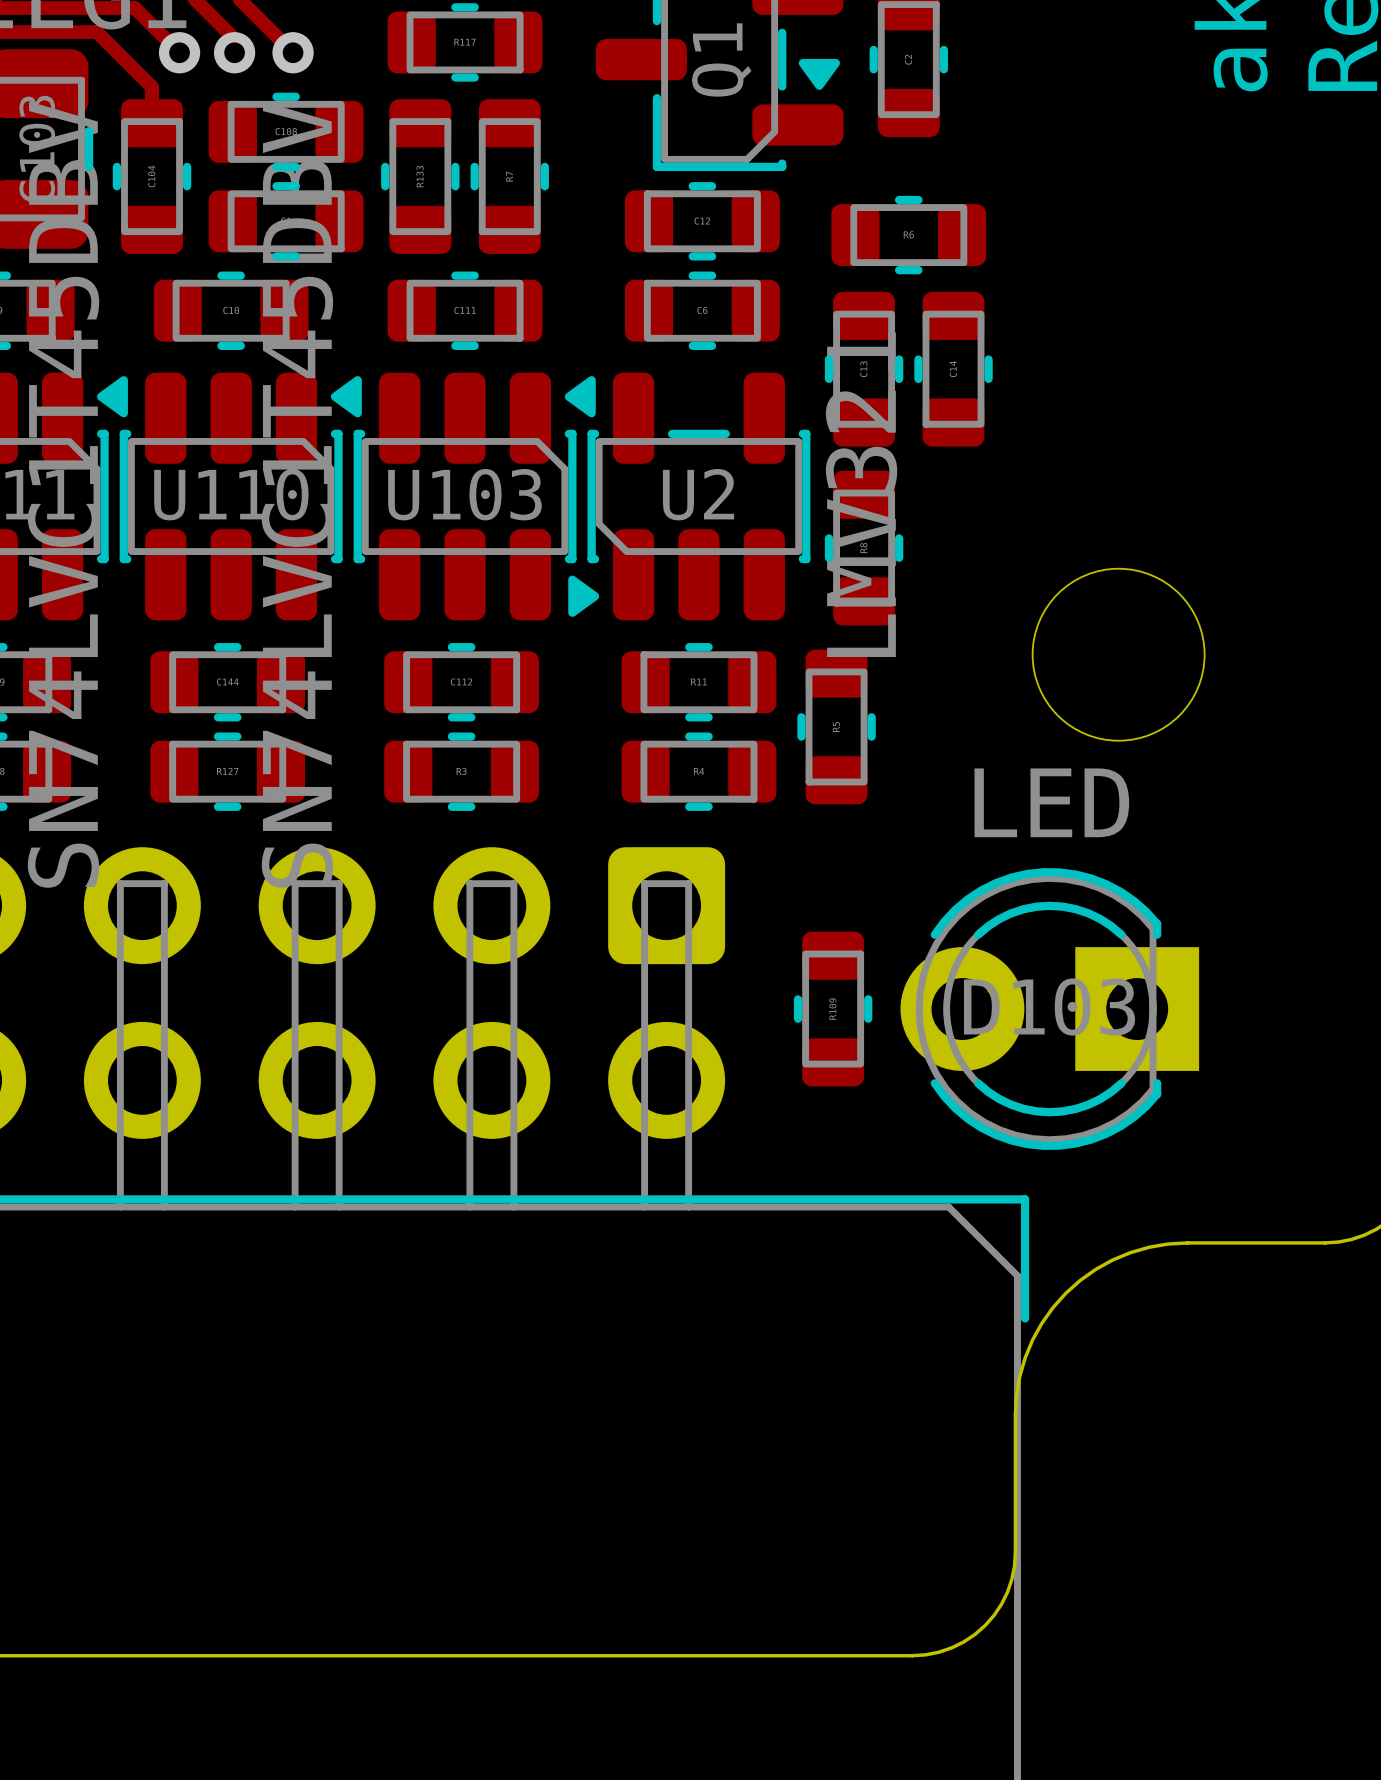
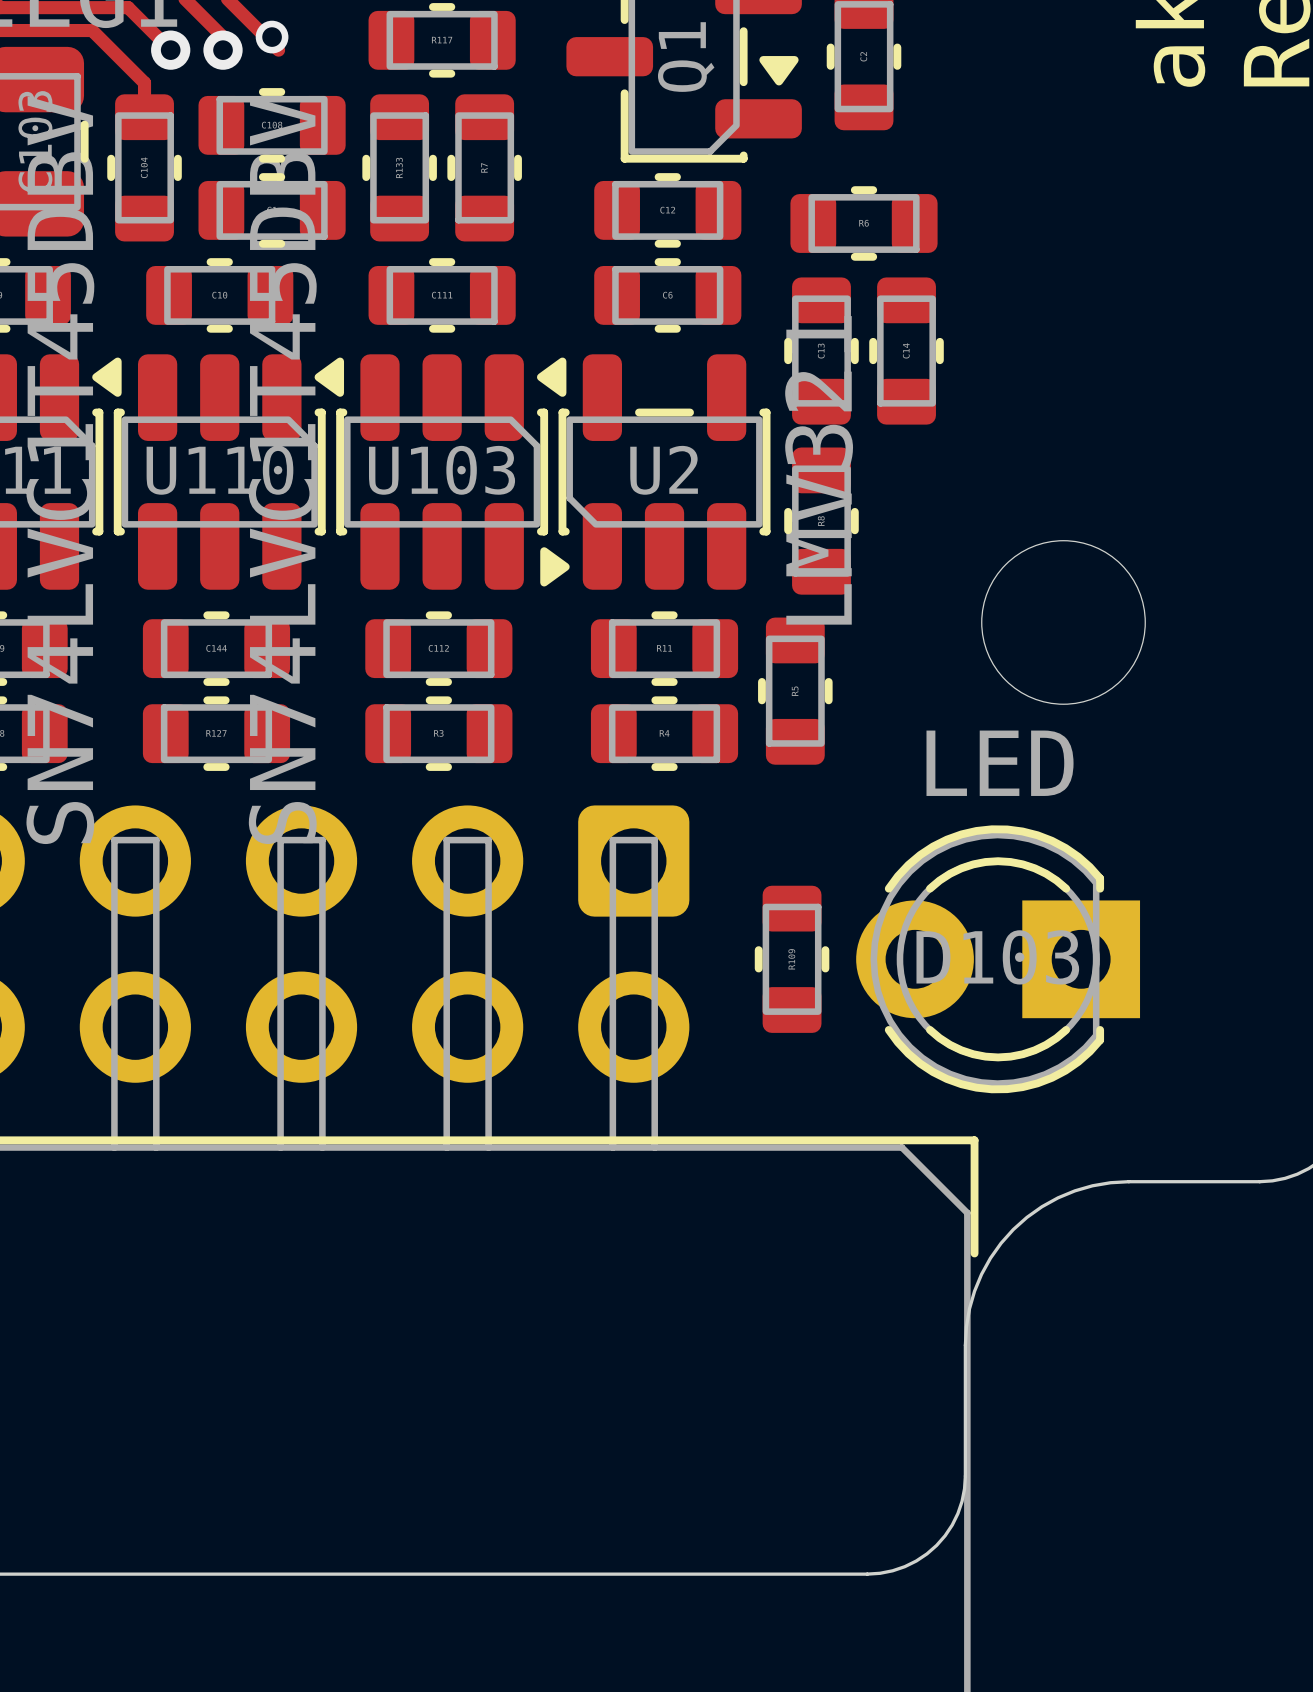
via position: (293, 52) -> (272, 37)

